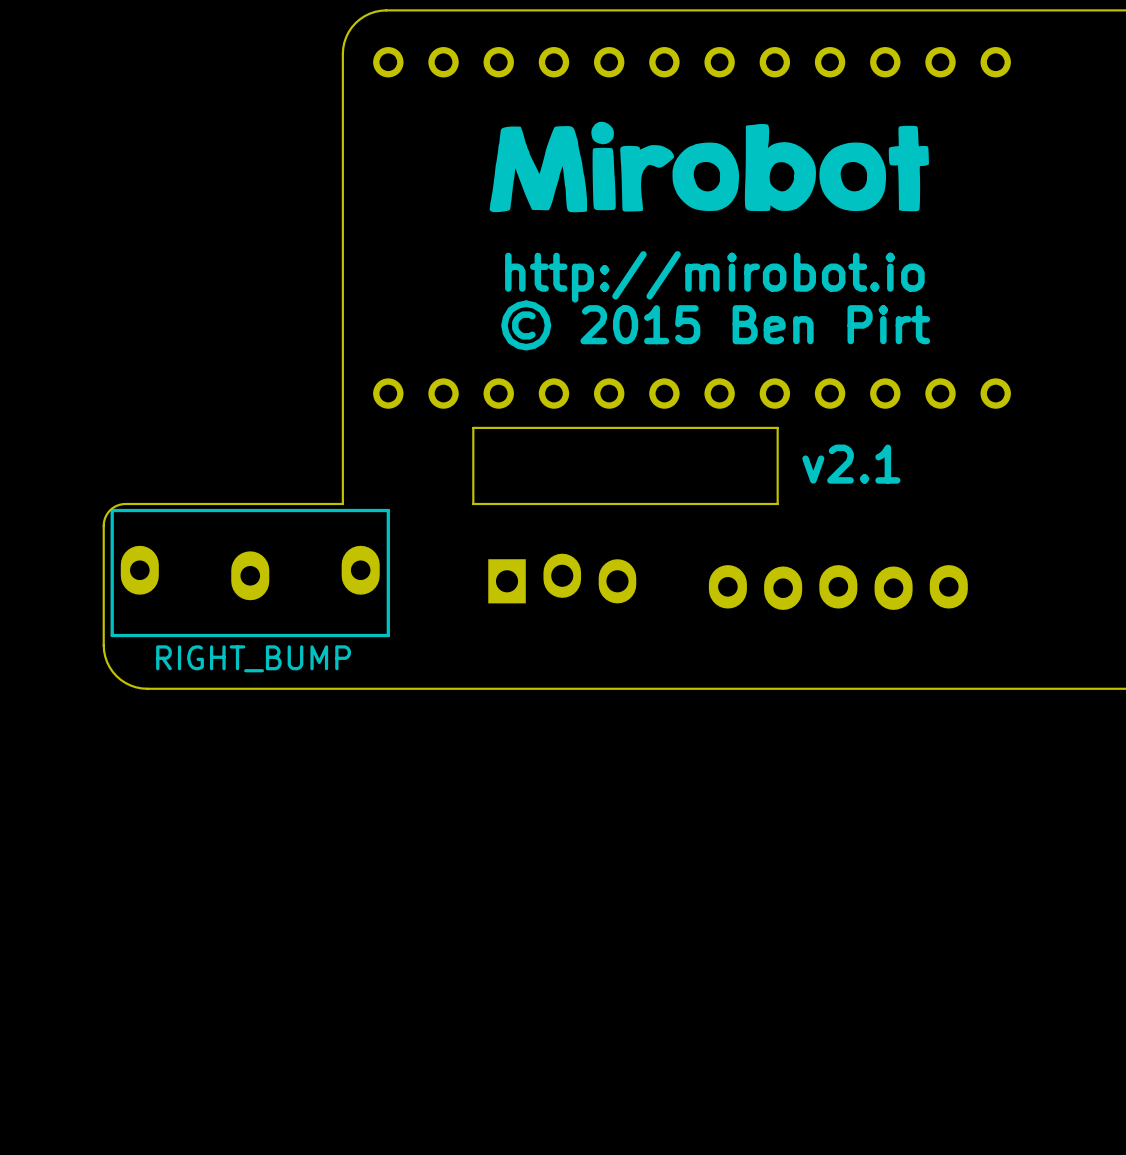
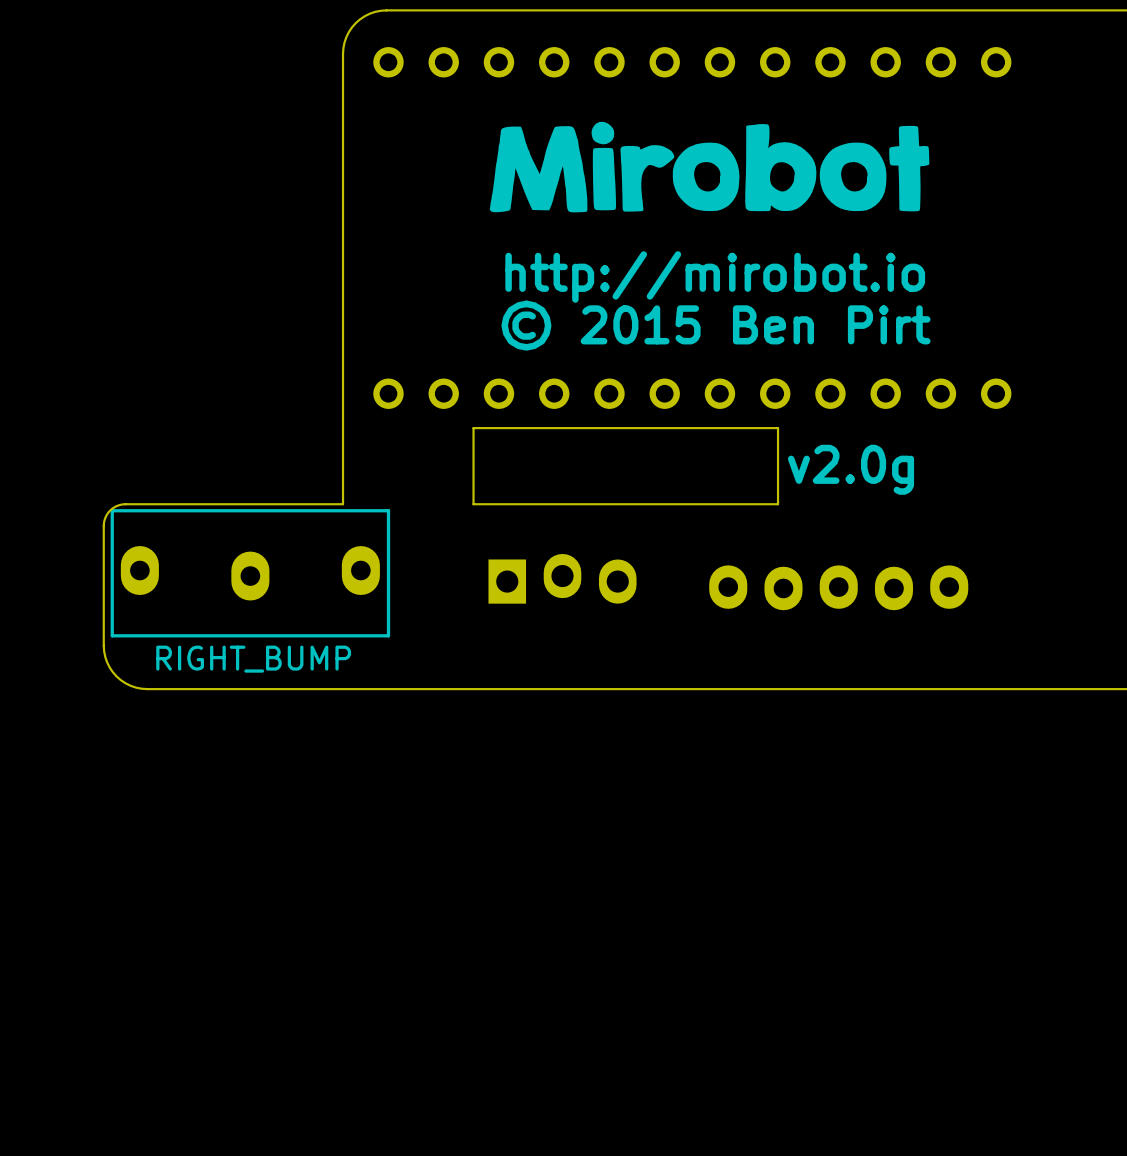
text: v2.1 (851, 464) -> v2.0g (851, 469)

